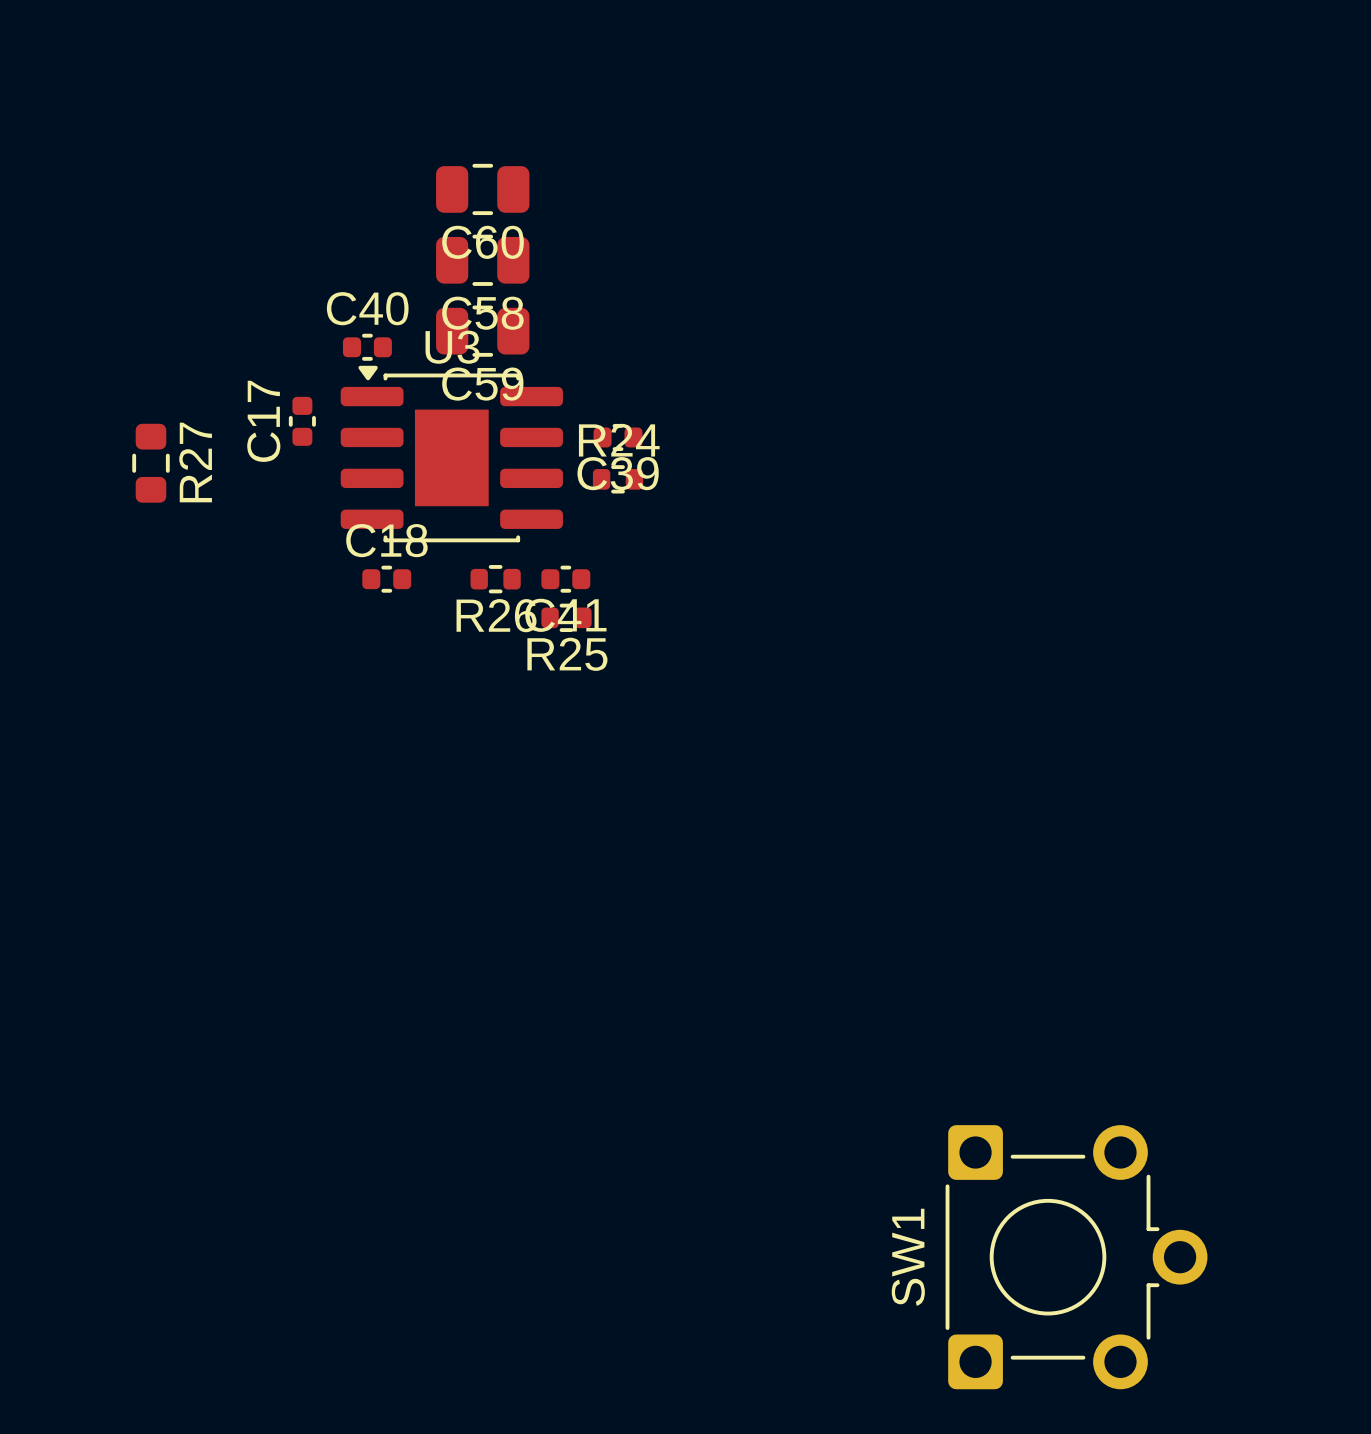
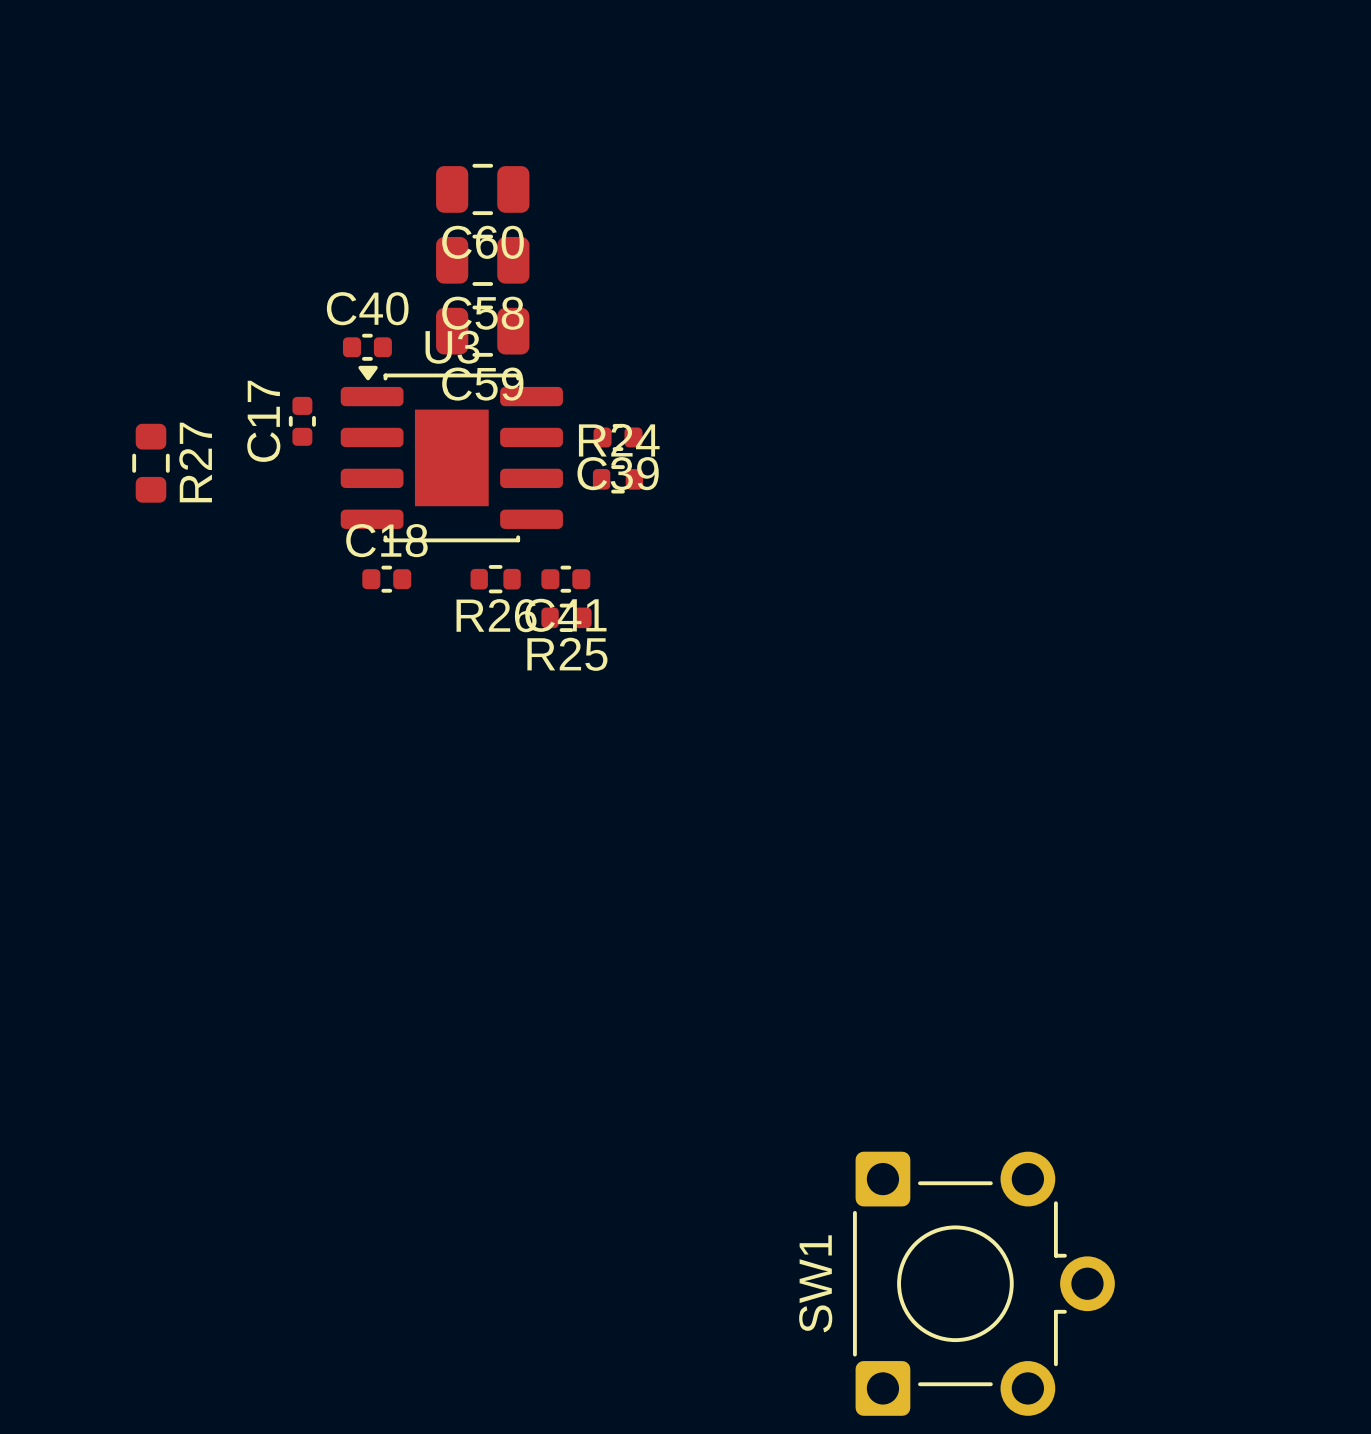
SW1 position: (1076, 1257) -> (983, 1283)

